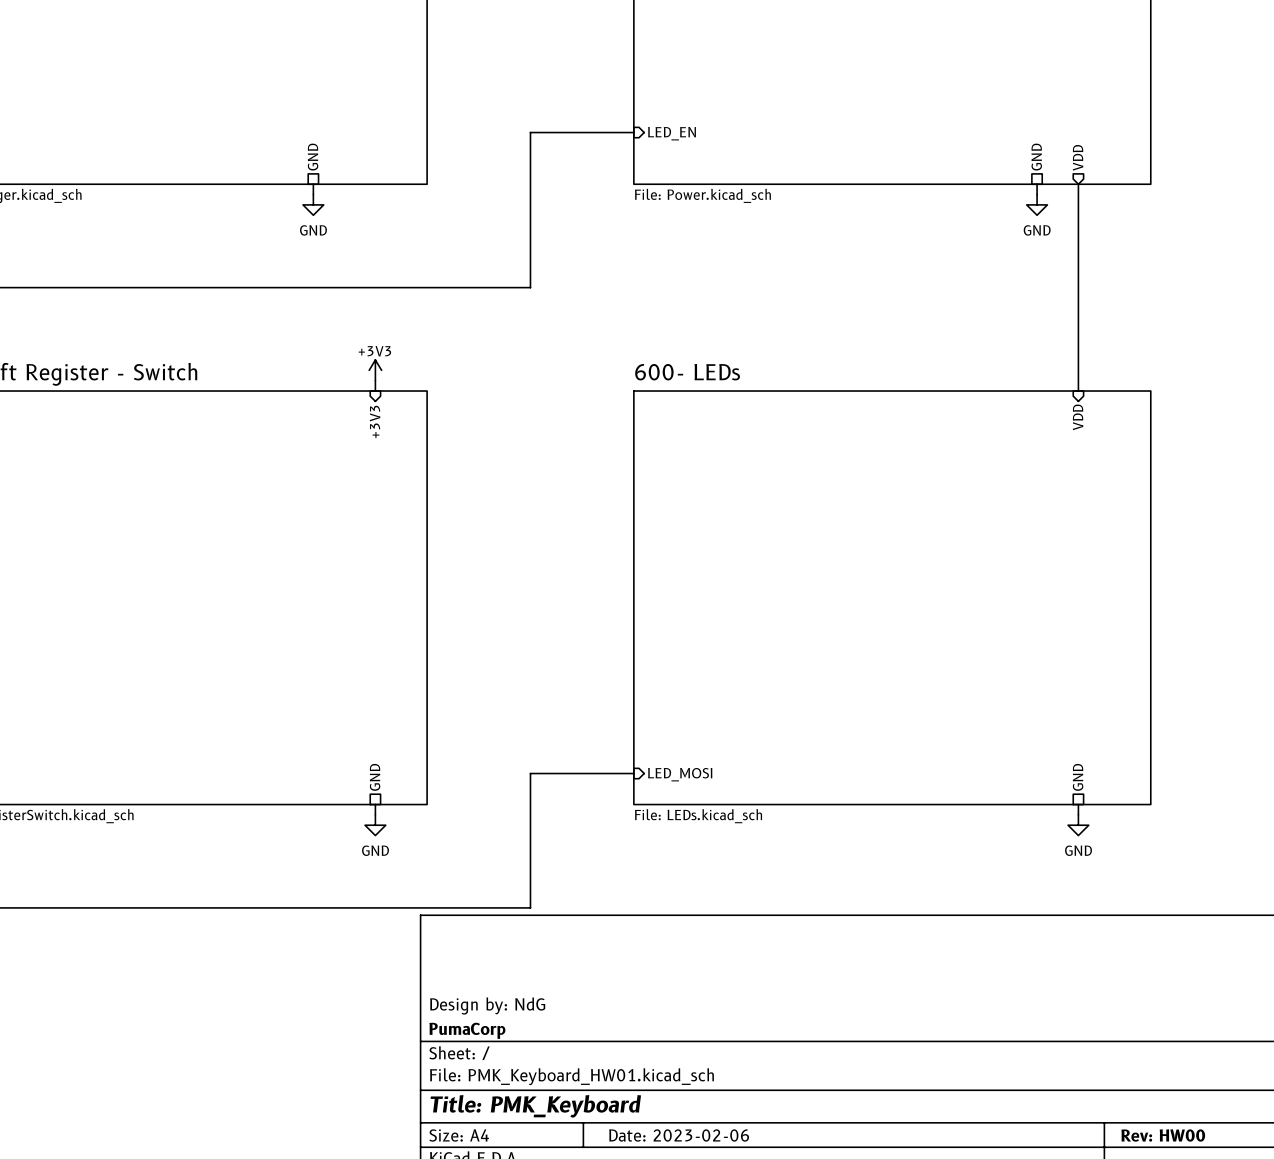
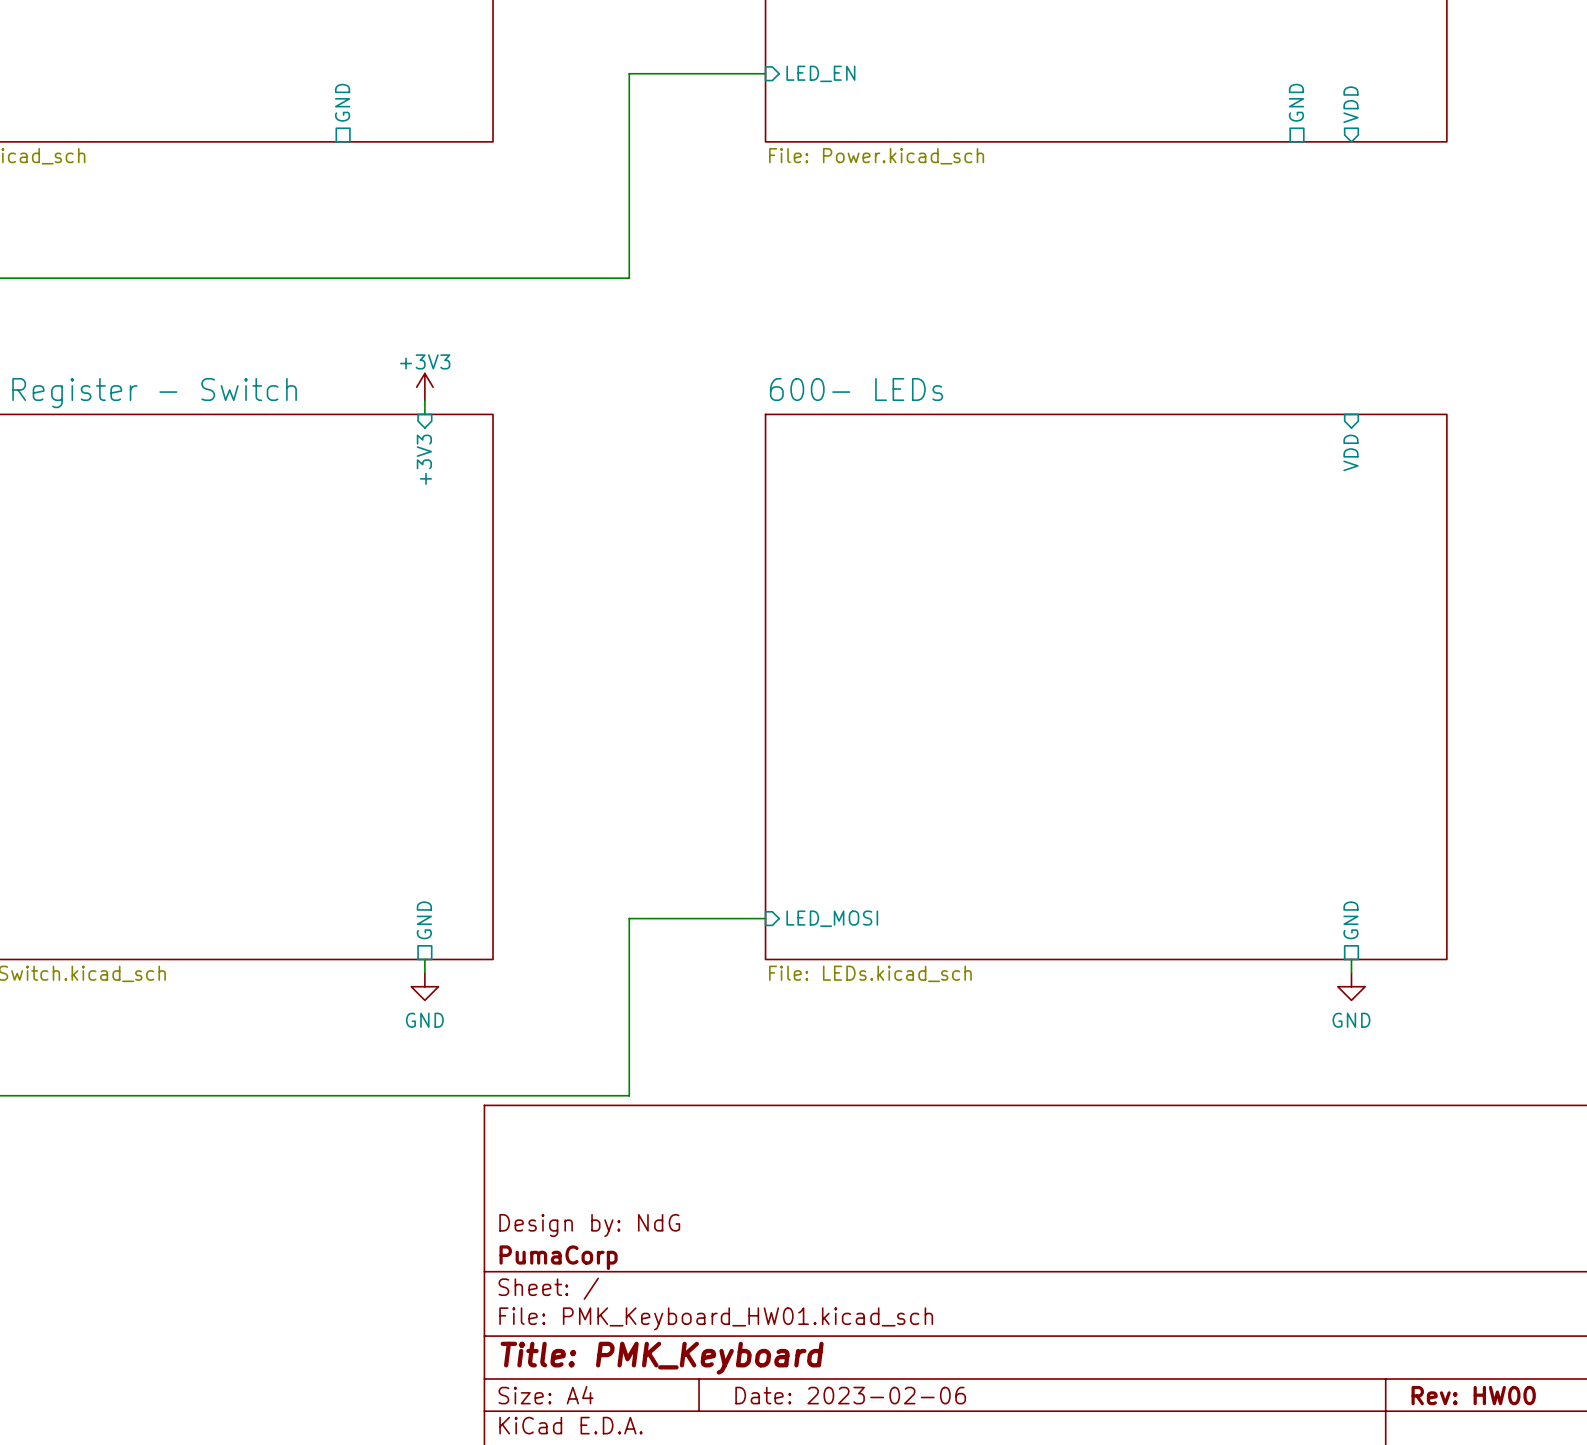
wire: (313, 184) (313, 194) -> none
wire: (1037, 184) (1037, 194) -> none
wire: (1078, 184) (1078, 391) -> none
power symbol: GND (313, 204) -> none
power symbol: GND (1037, 204) -> none

